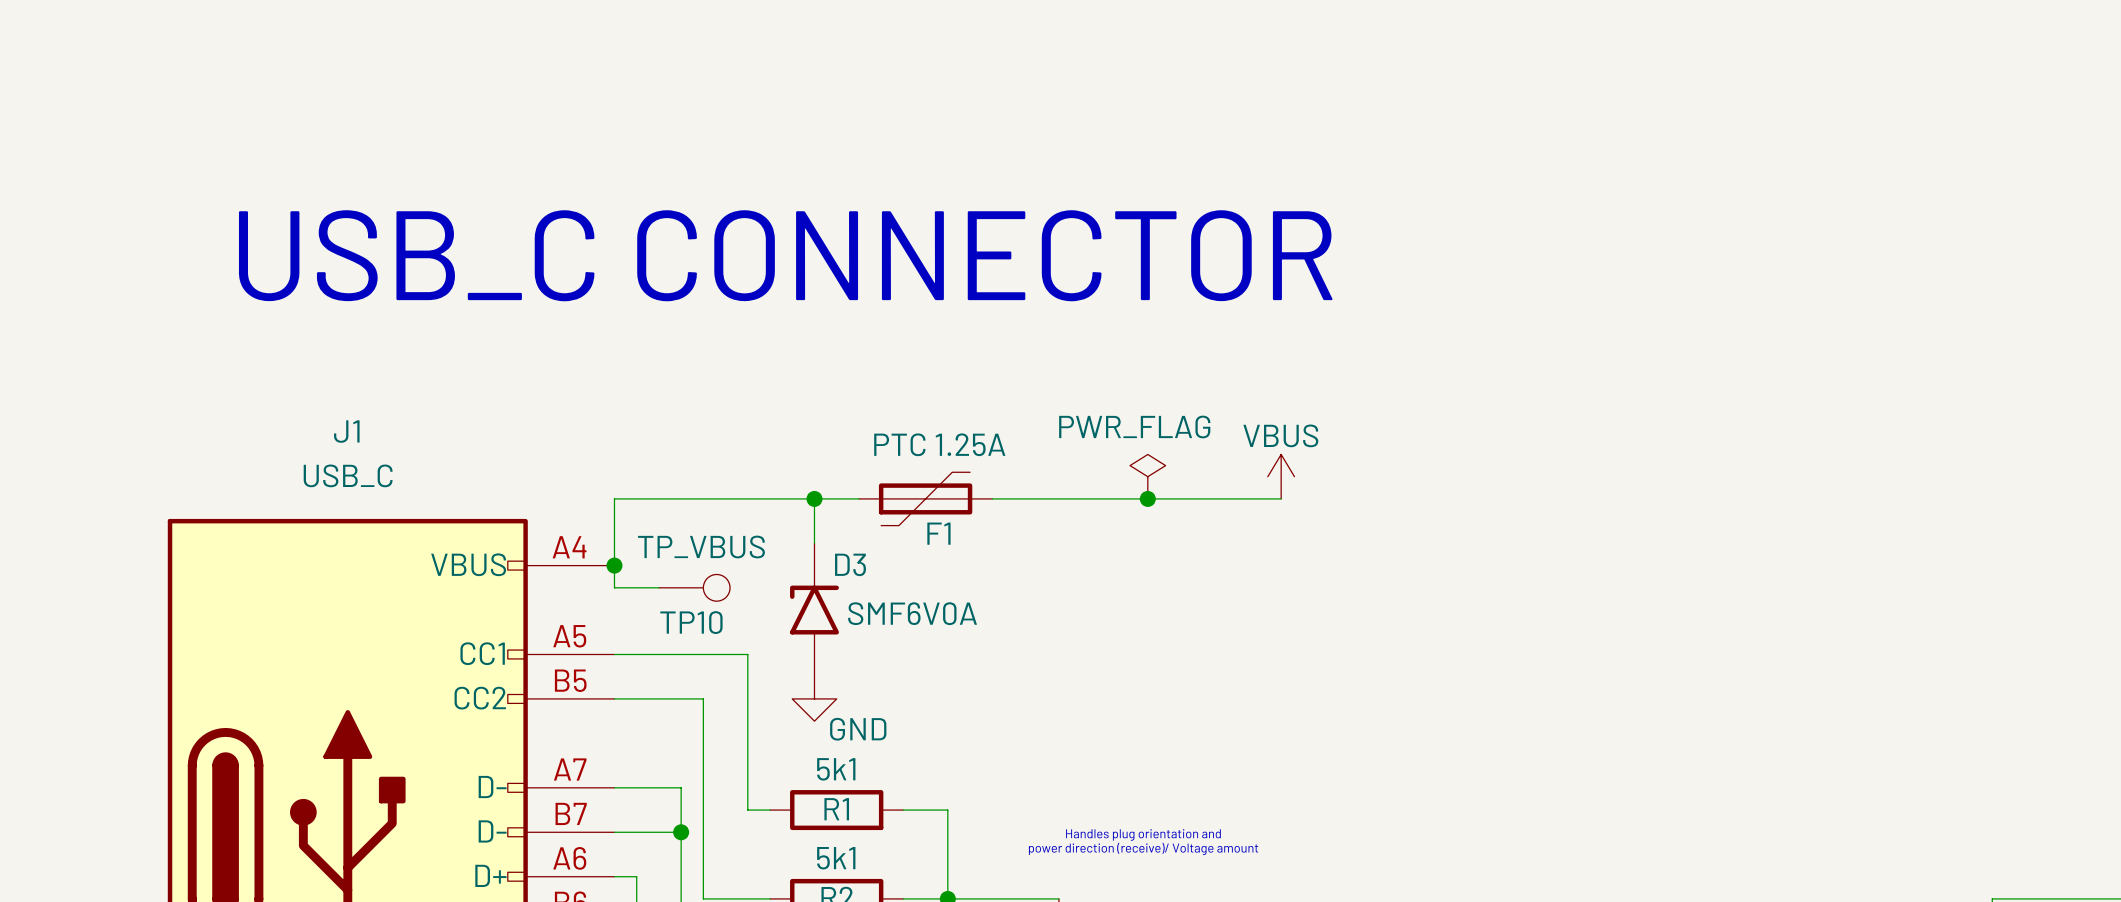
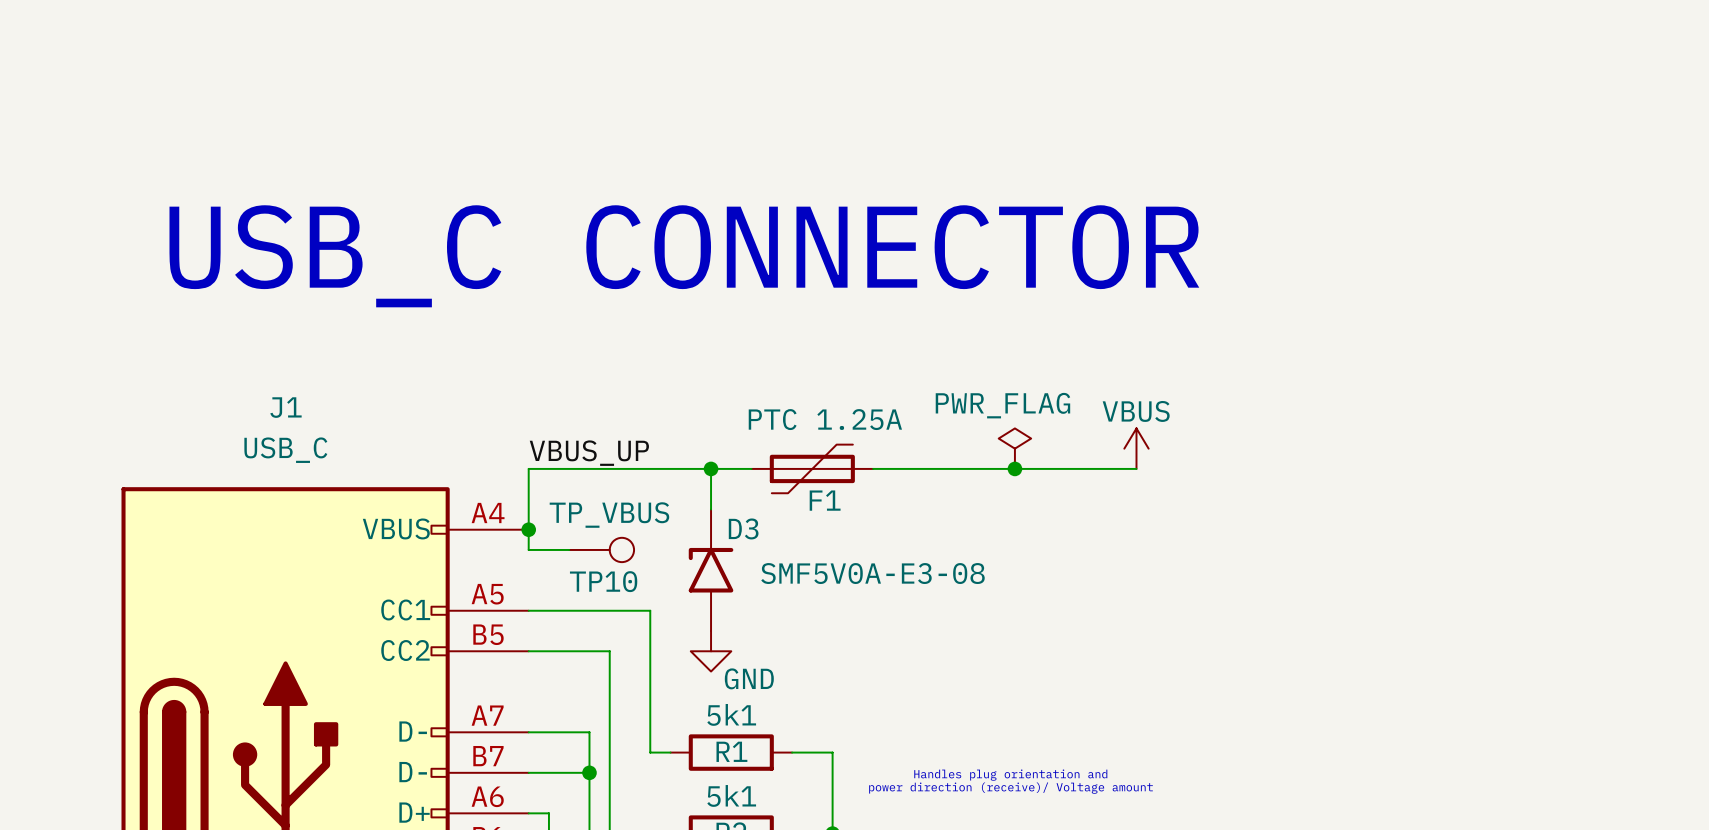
label: none -> VBUS_UP (589, 453)
D3 value: SMF6V0A (912, 613) -> SMF5V0A-E3-08 (872, 573)

